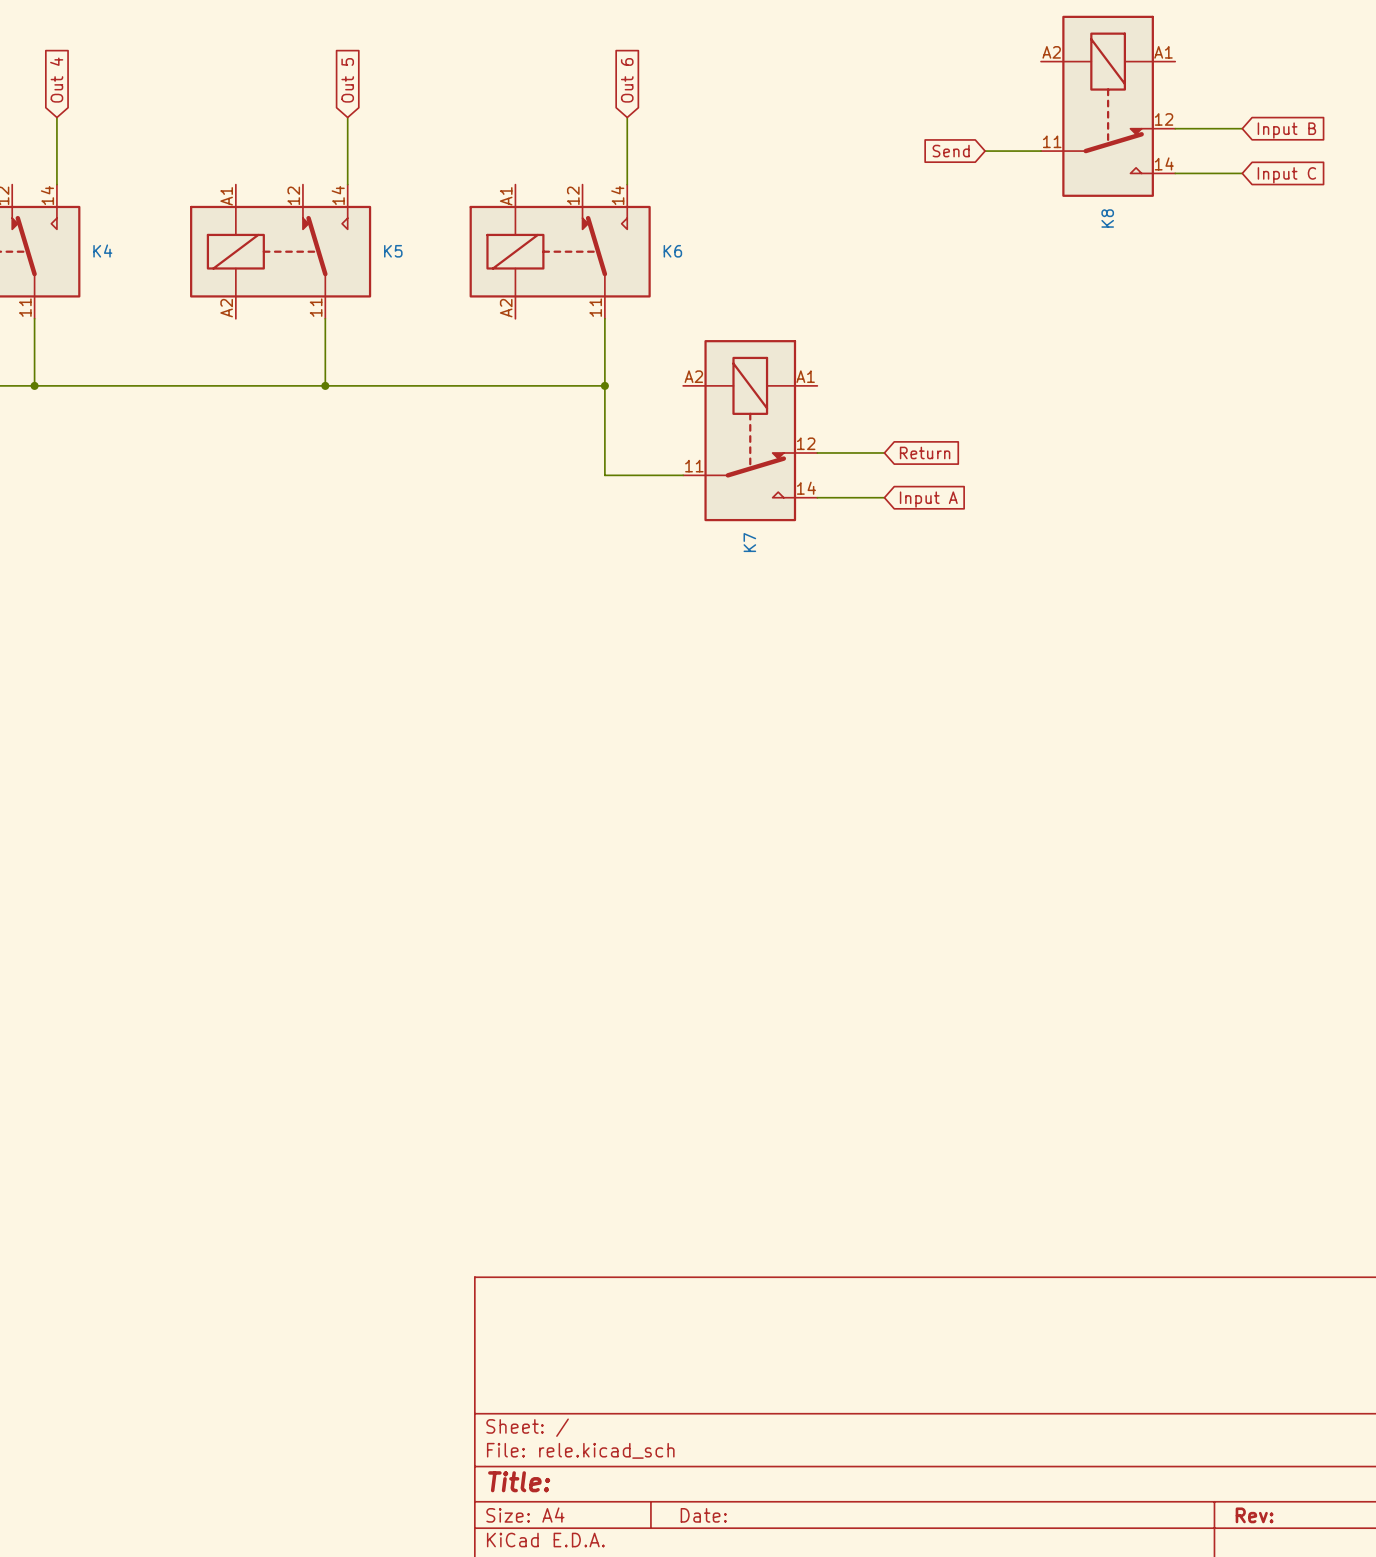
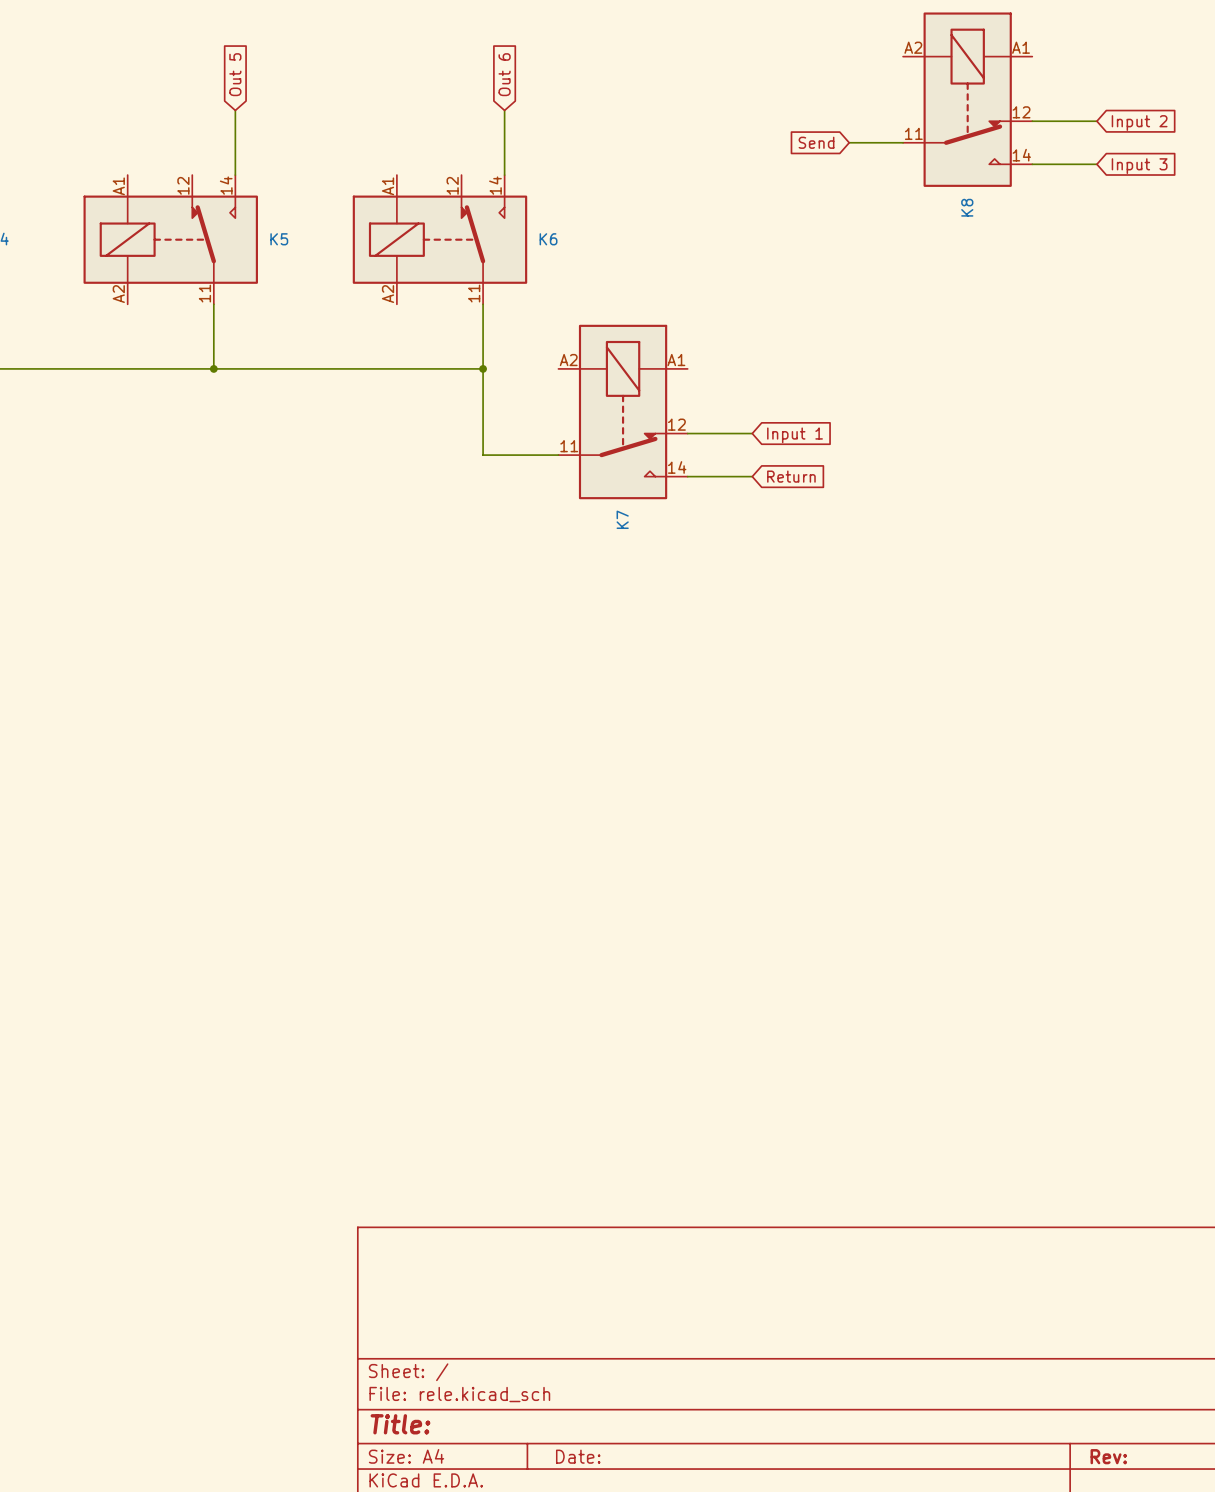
global label: Input B (1286, 130) -> Input 2 (1139, 123)
global label: Input C (1286, 175) -> Input 3 (1139, 166)
global label: Return (925, 452) -> Input 1 (795, 435)
global label: Input A (928, 499) -> Return (791, 476)

